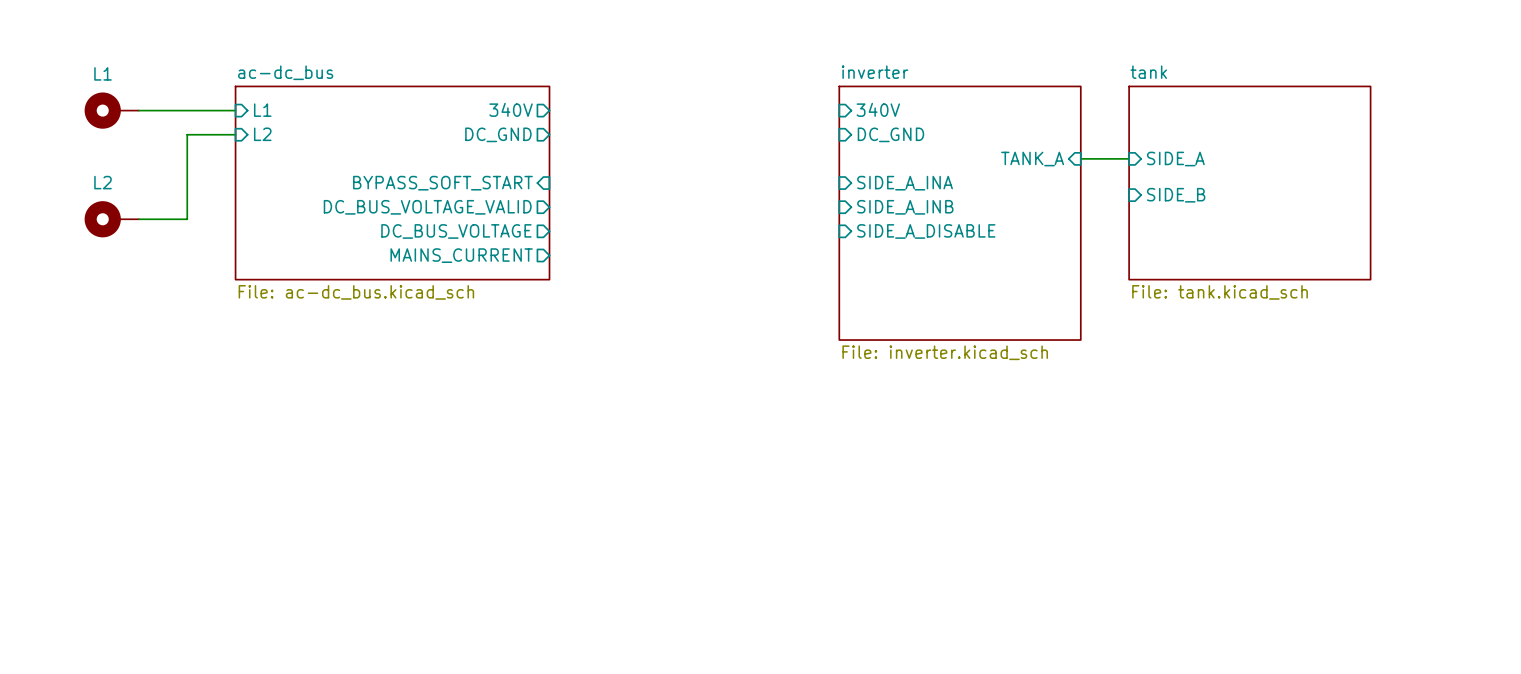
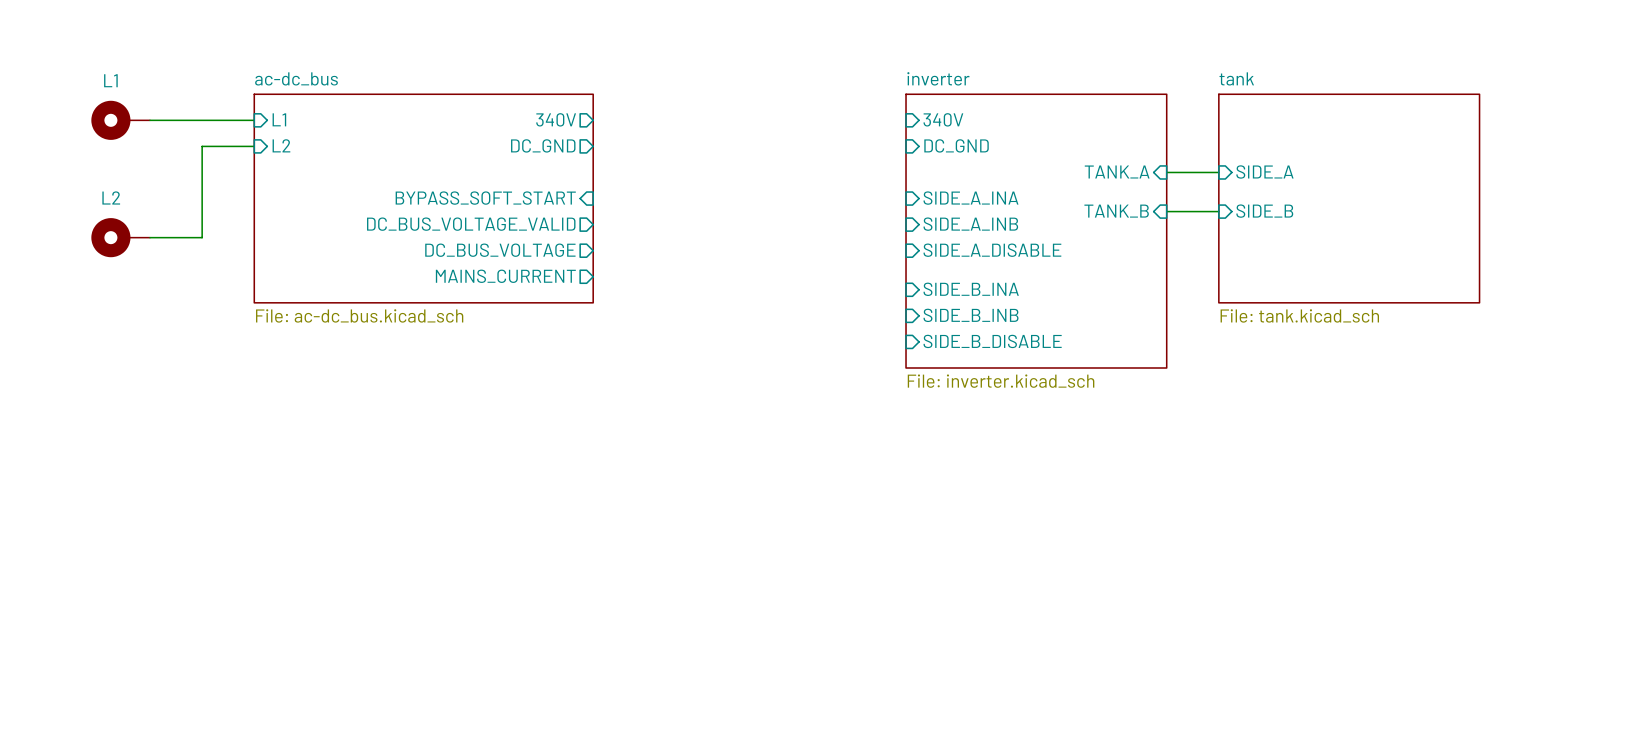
sheet pin: none -> TANK_B (1116, 211)
wire: none -> (1166, 211) (1218, 211)
sheet pin: none -> SIDE_B_INA (971, 289)
sheet pin: none -> SIDE_B_INB (971, 315)
sheet pin: none -> SIDE_B_DISABLE (992, 341)

